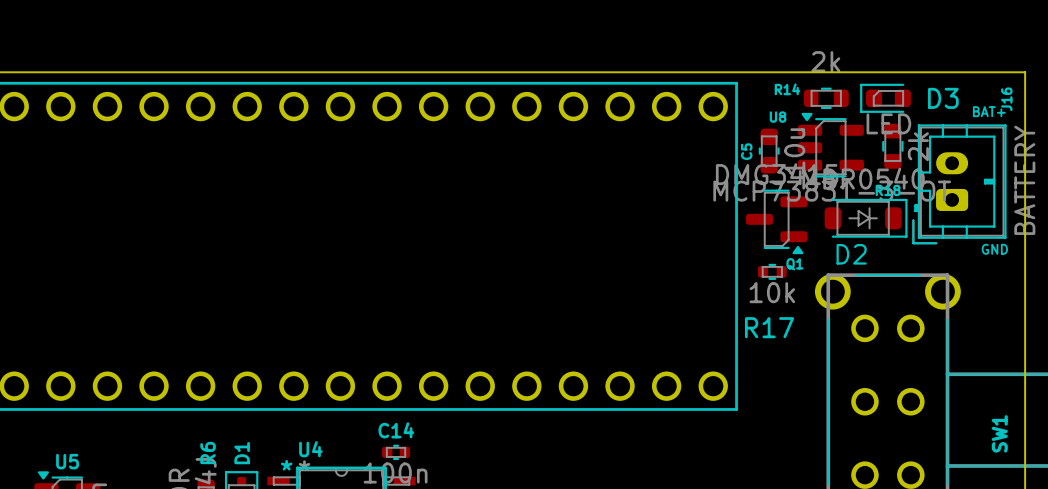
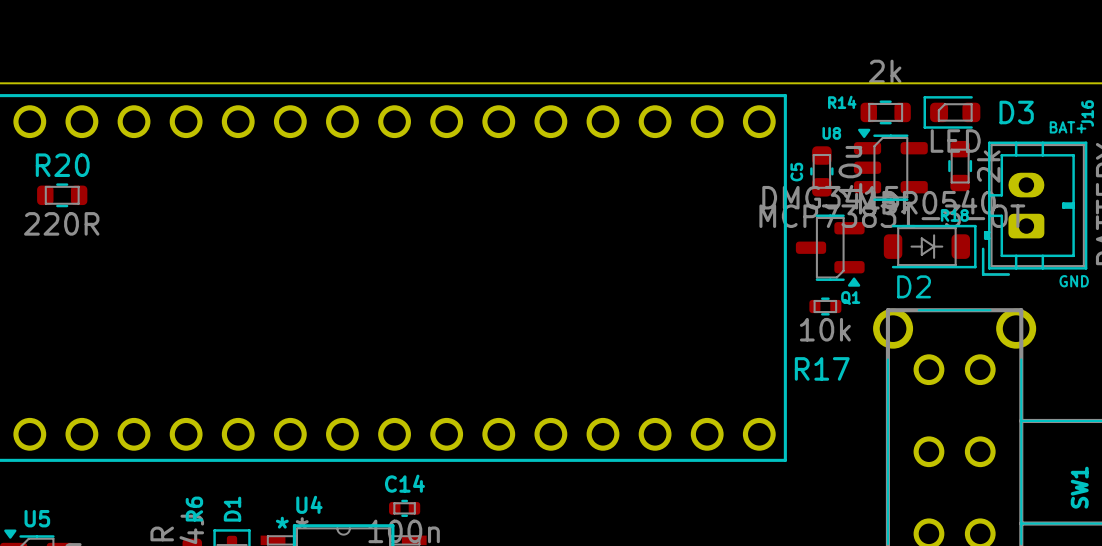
R20: none -> 220R (62, 195)

